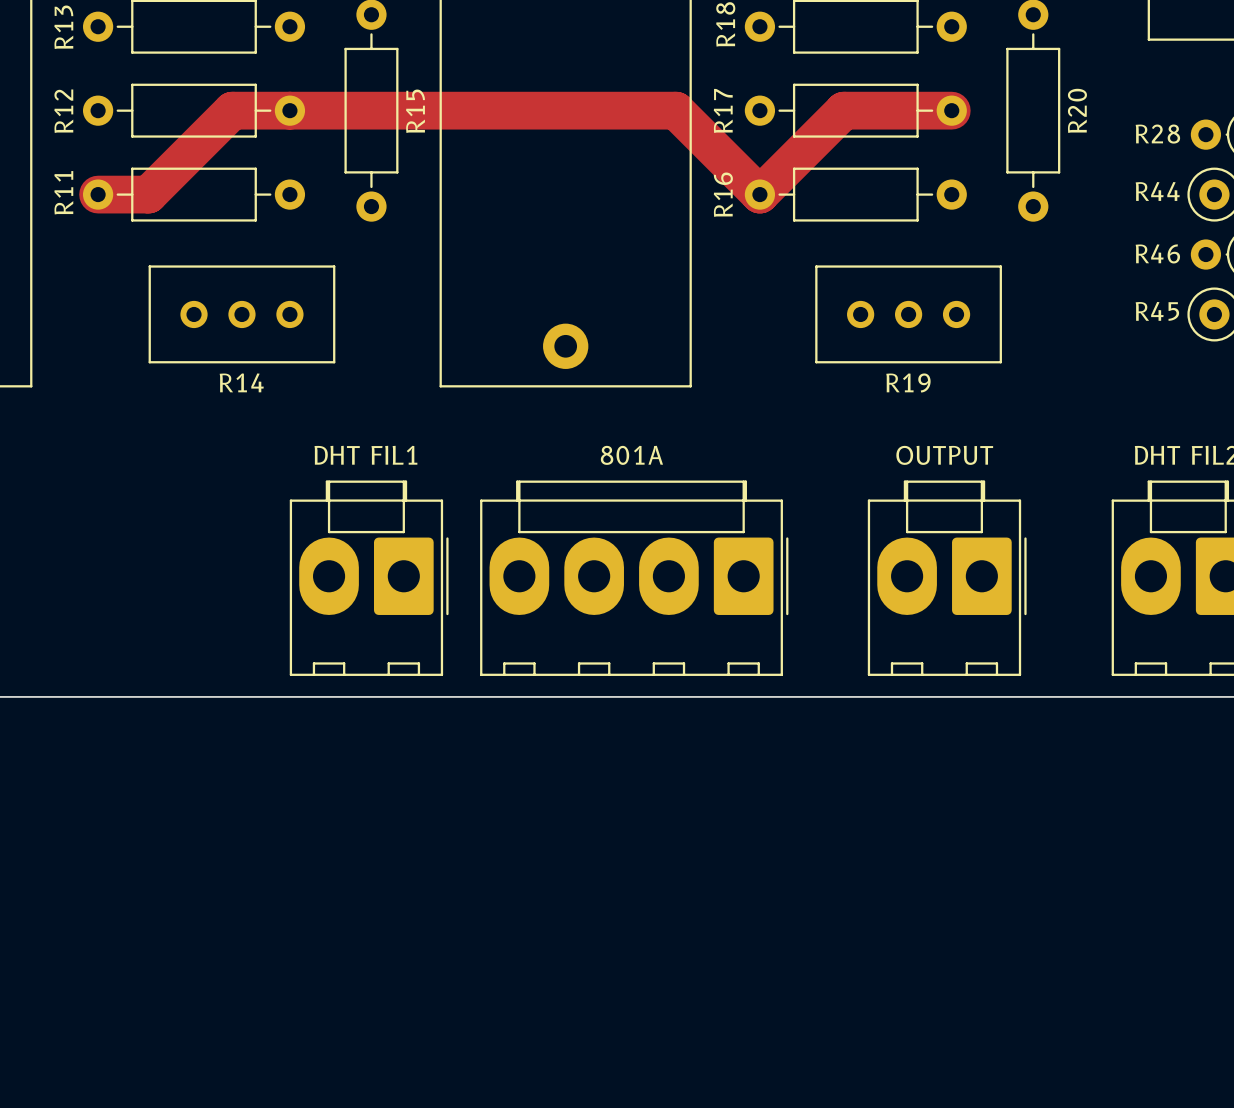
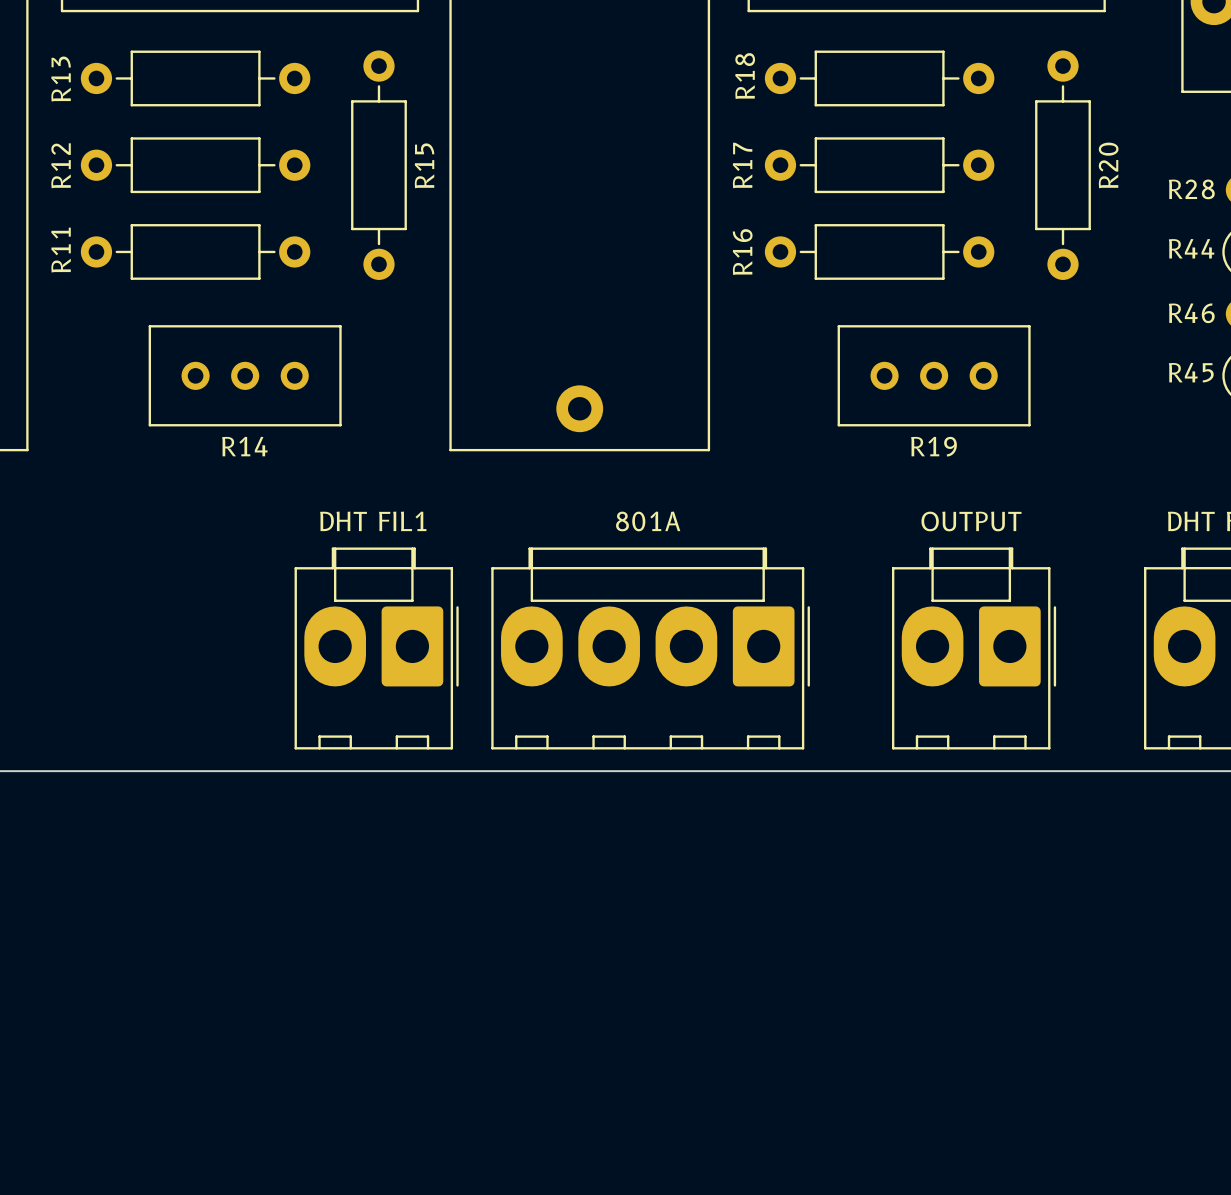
track: (951, 110) (843, 110) (759, 194) (675, 110) (232, 110) (148, 194) (98, 194) -> none

